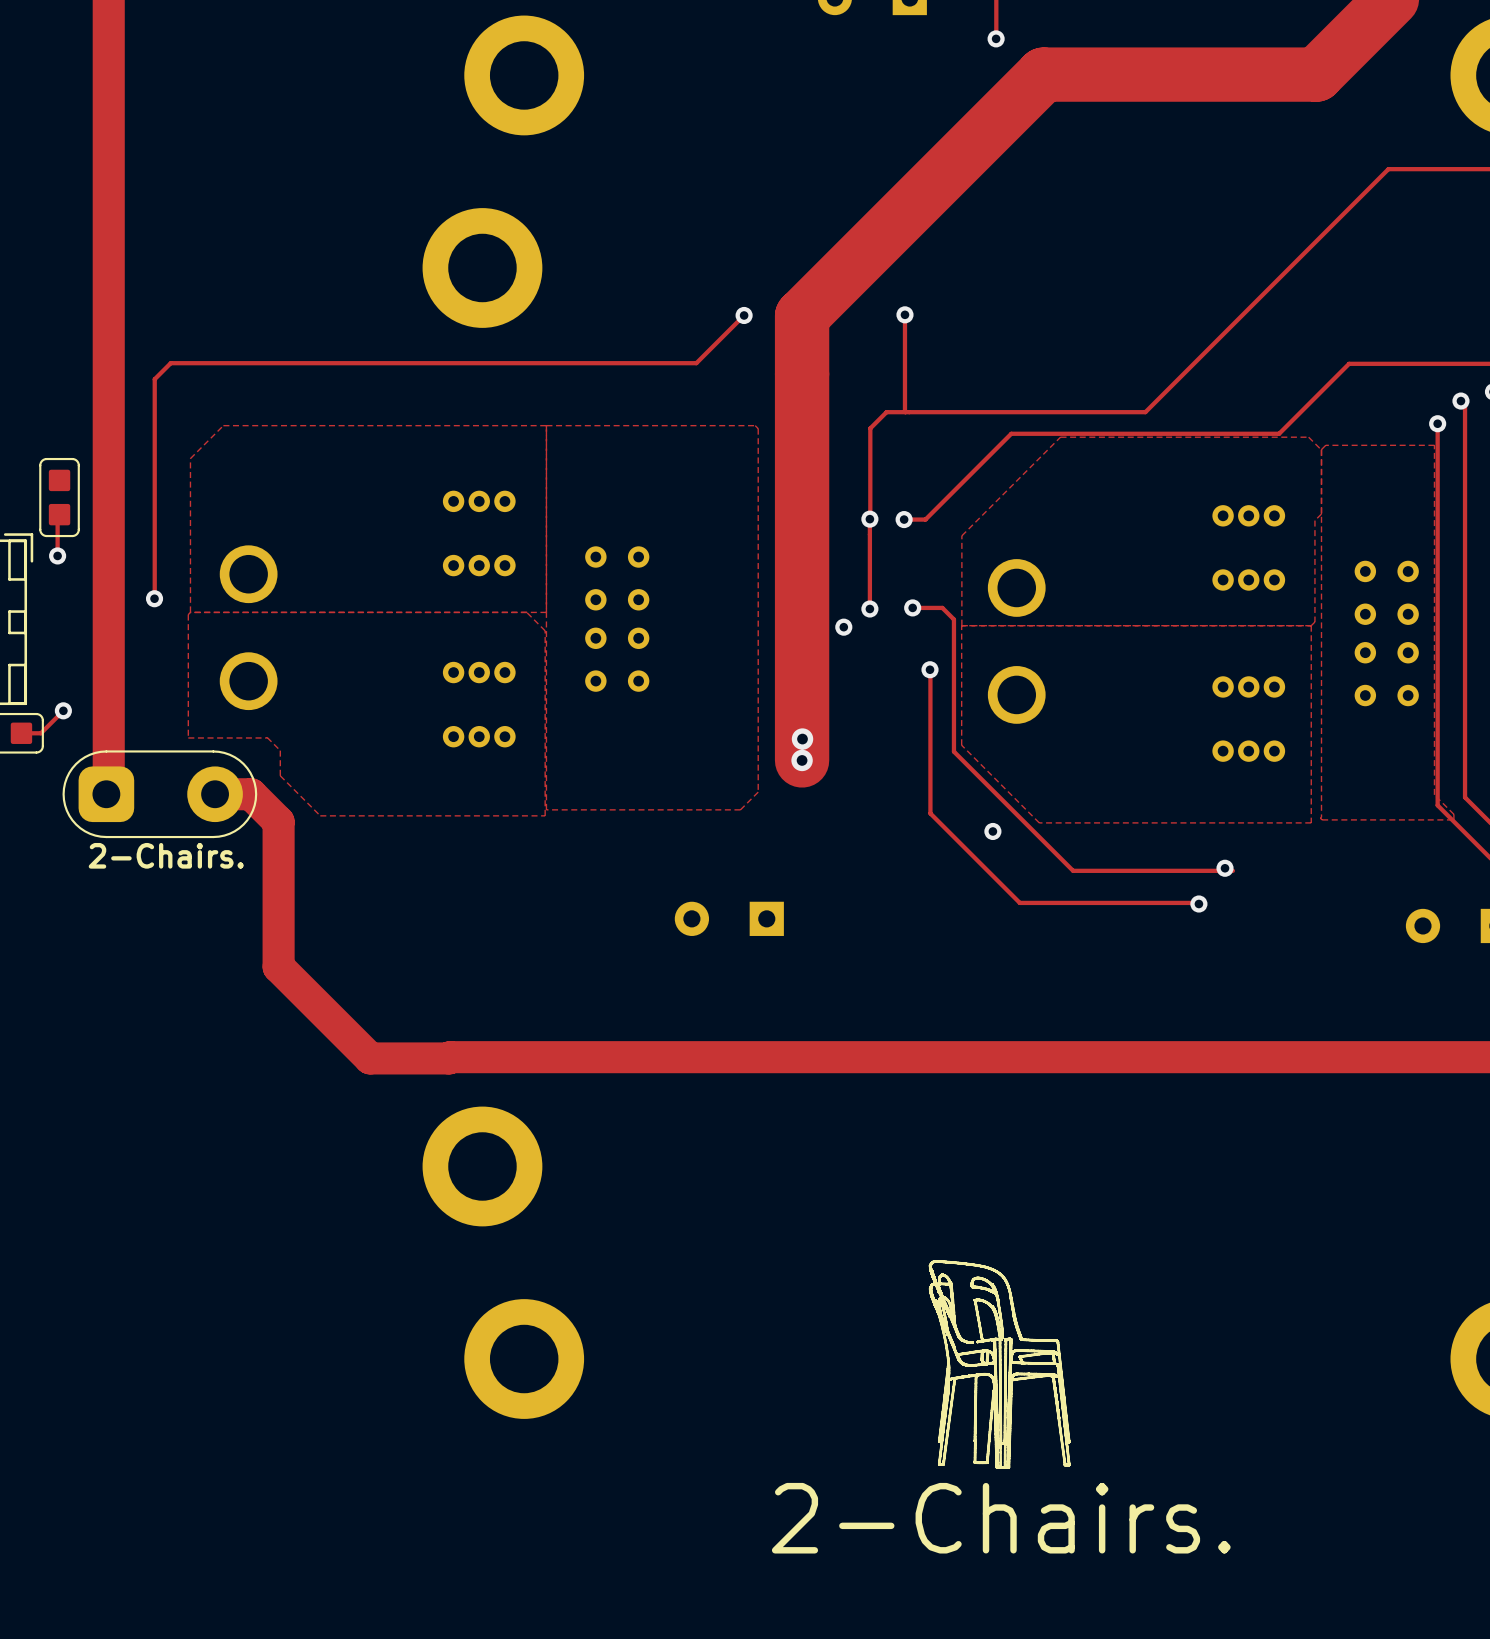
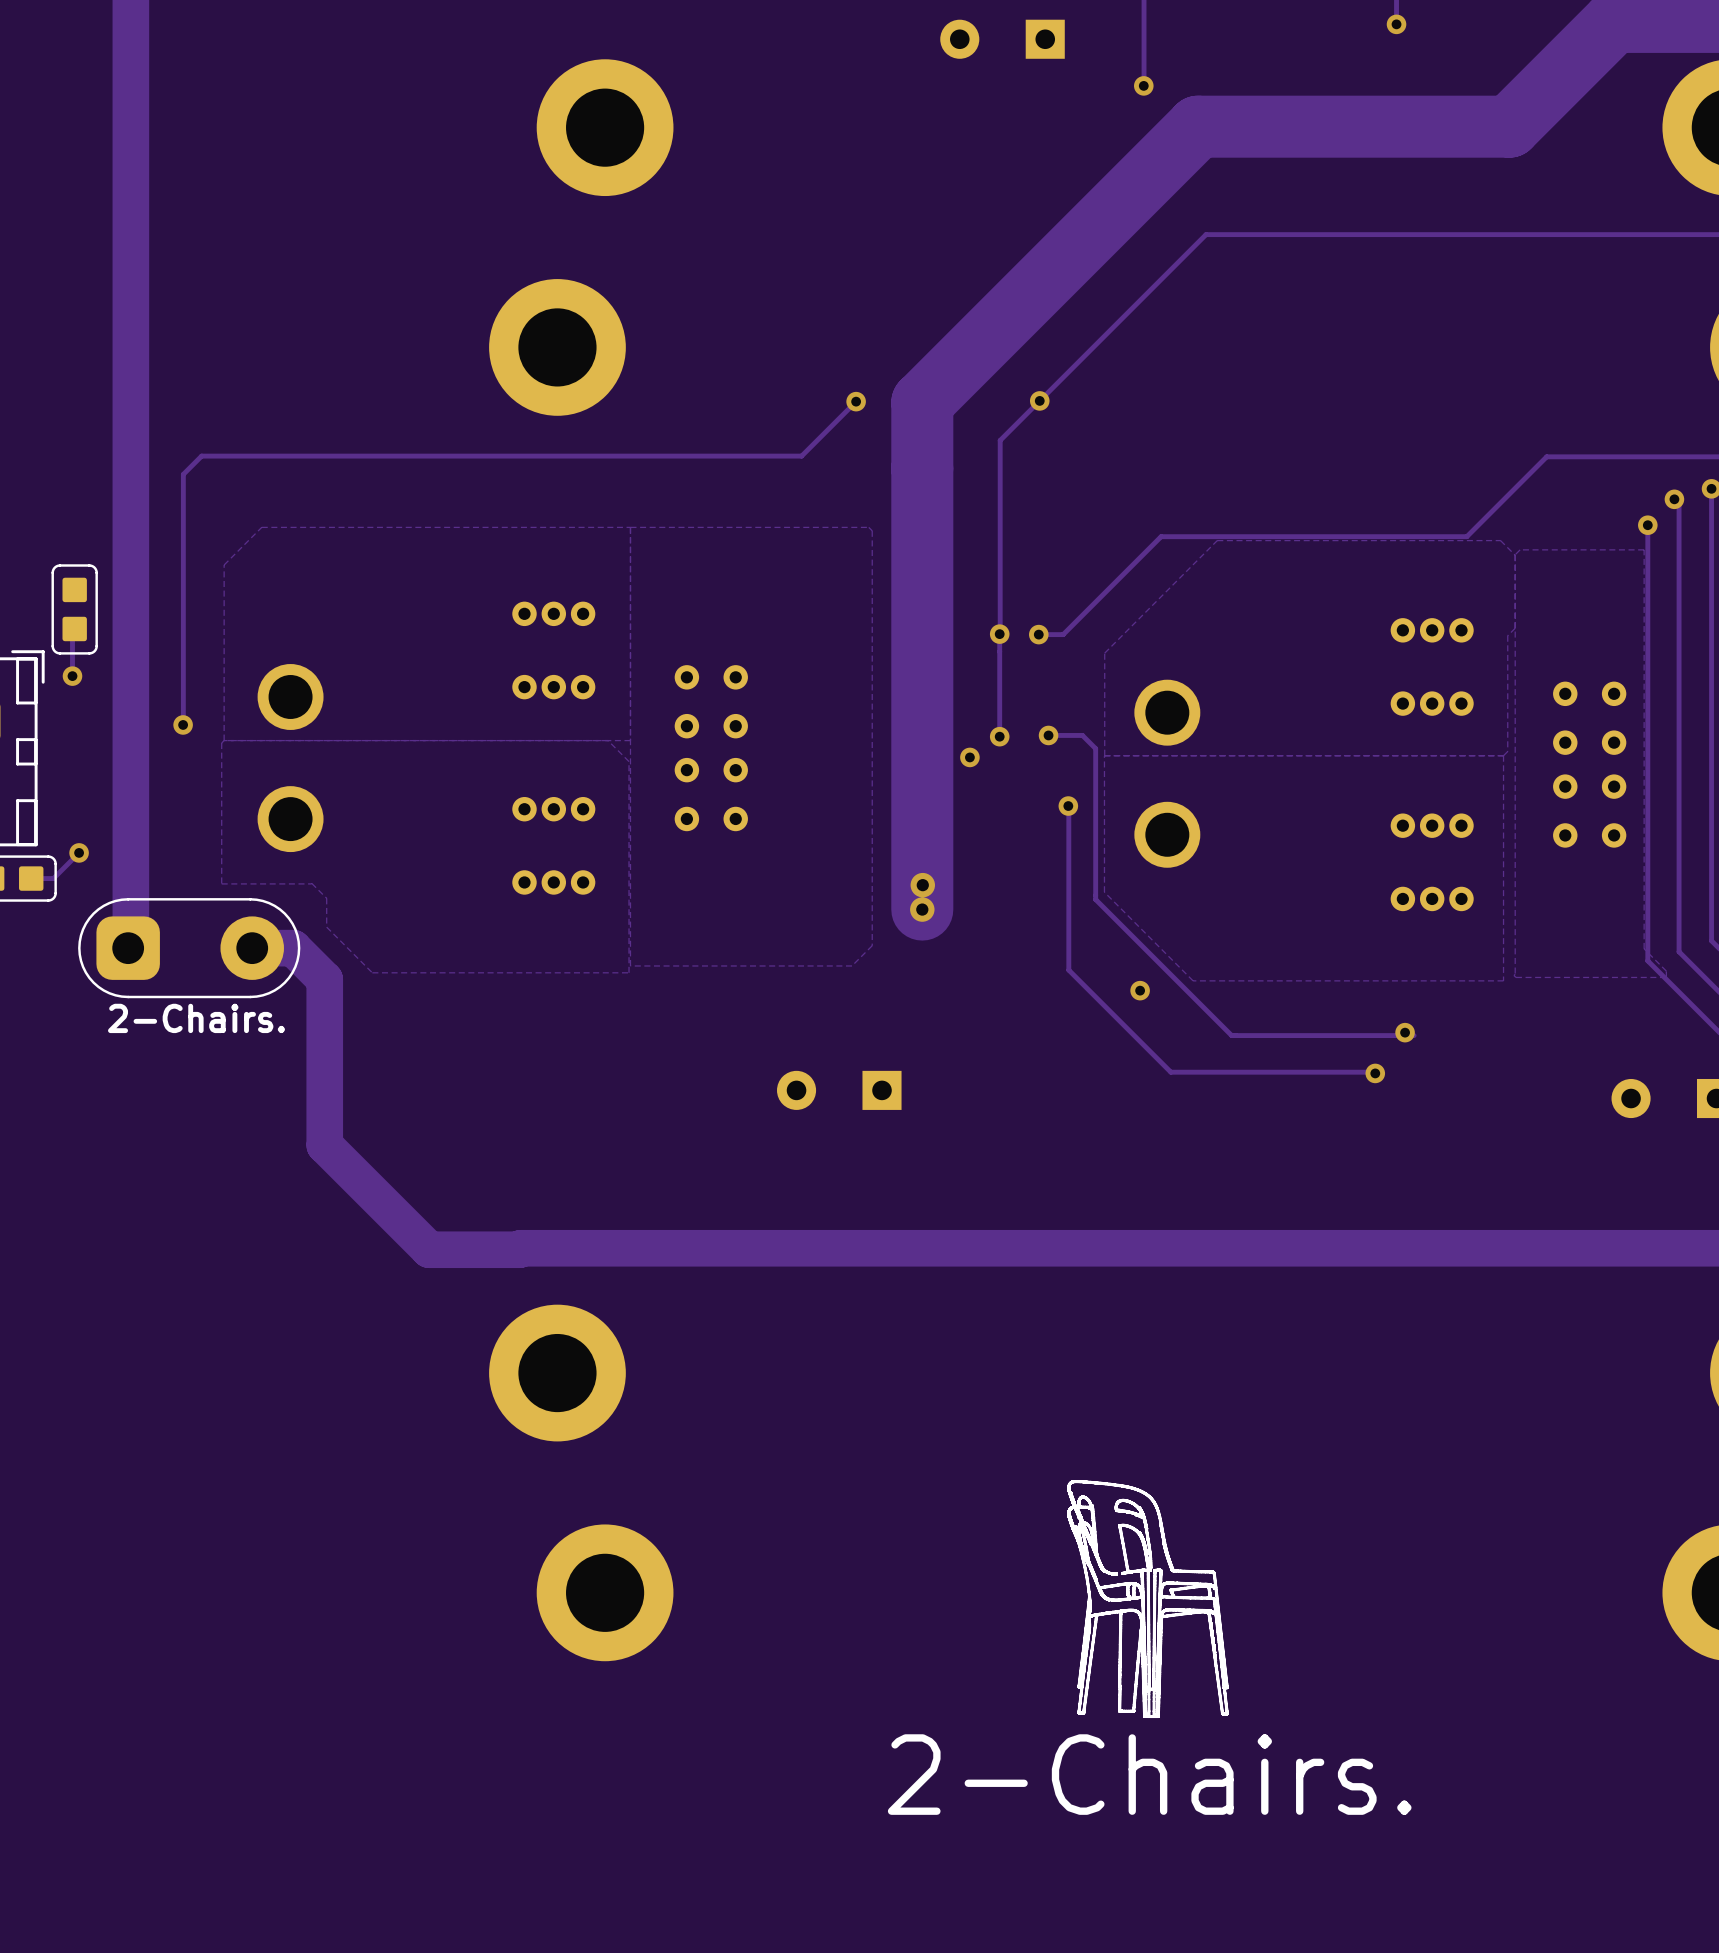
track: (1388, 169) (1145, 412) (886, 412) (870, 428) -> (1591, 234) (1206, 234) (1040, 400)
track: (904, 314) (905, 412) -> (1040, 401) (1000, 440) (1000, 530)

